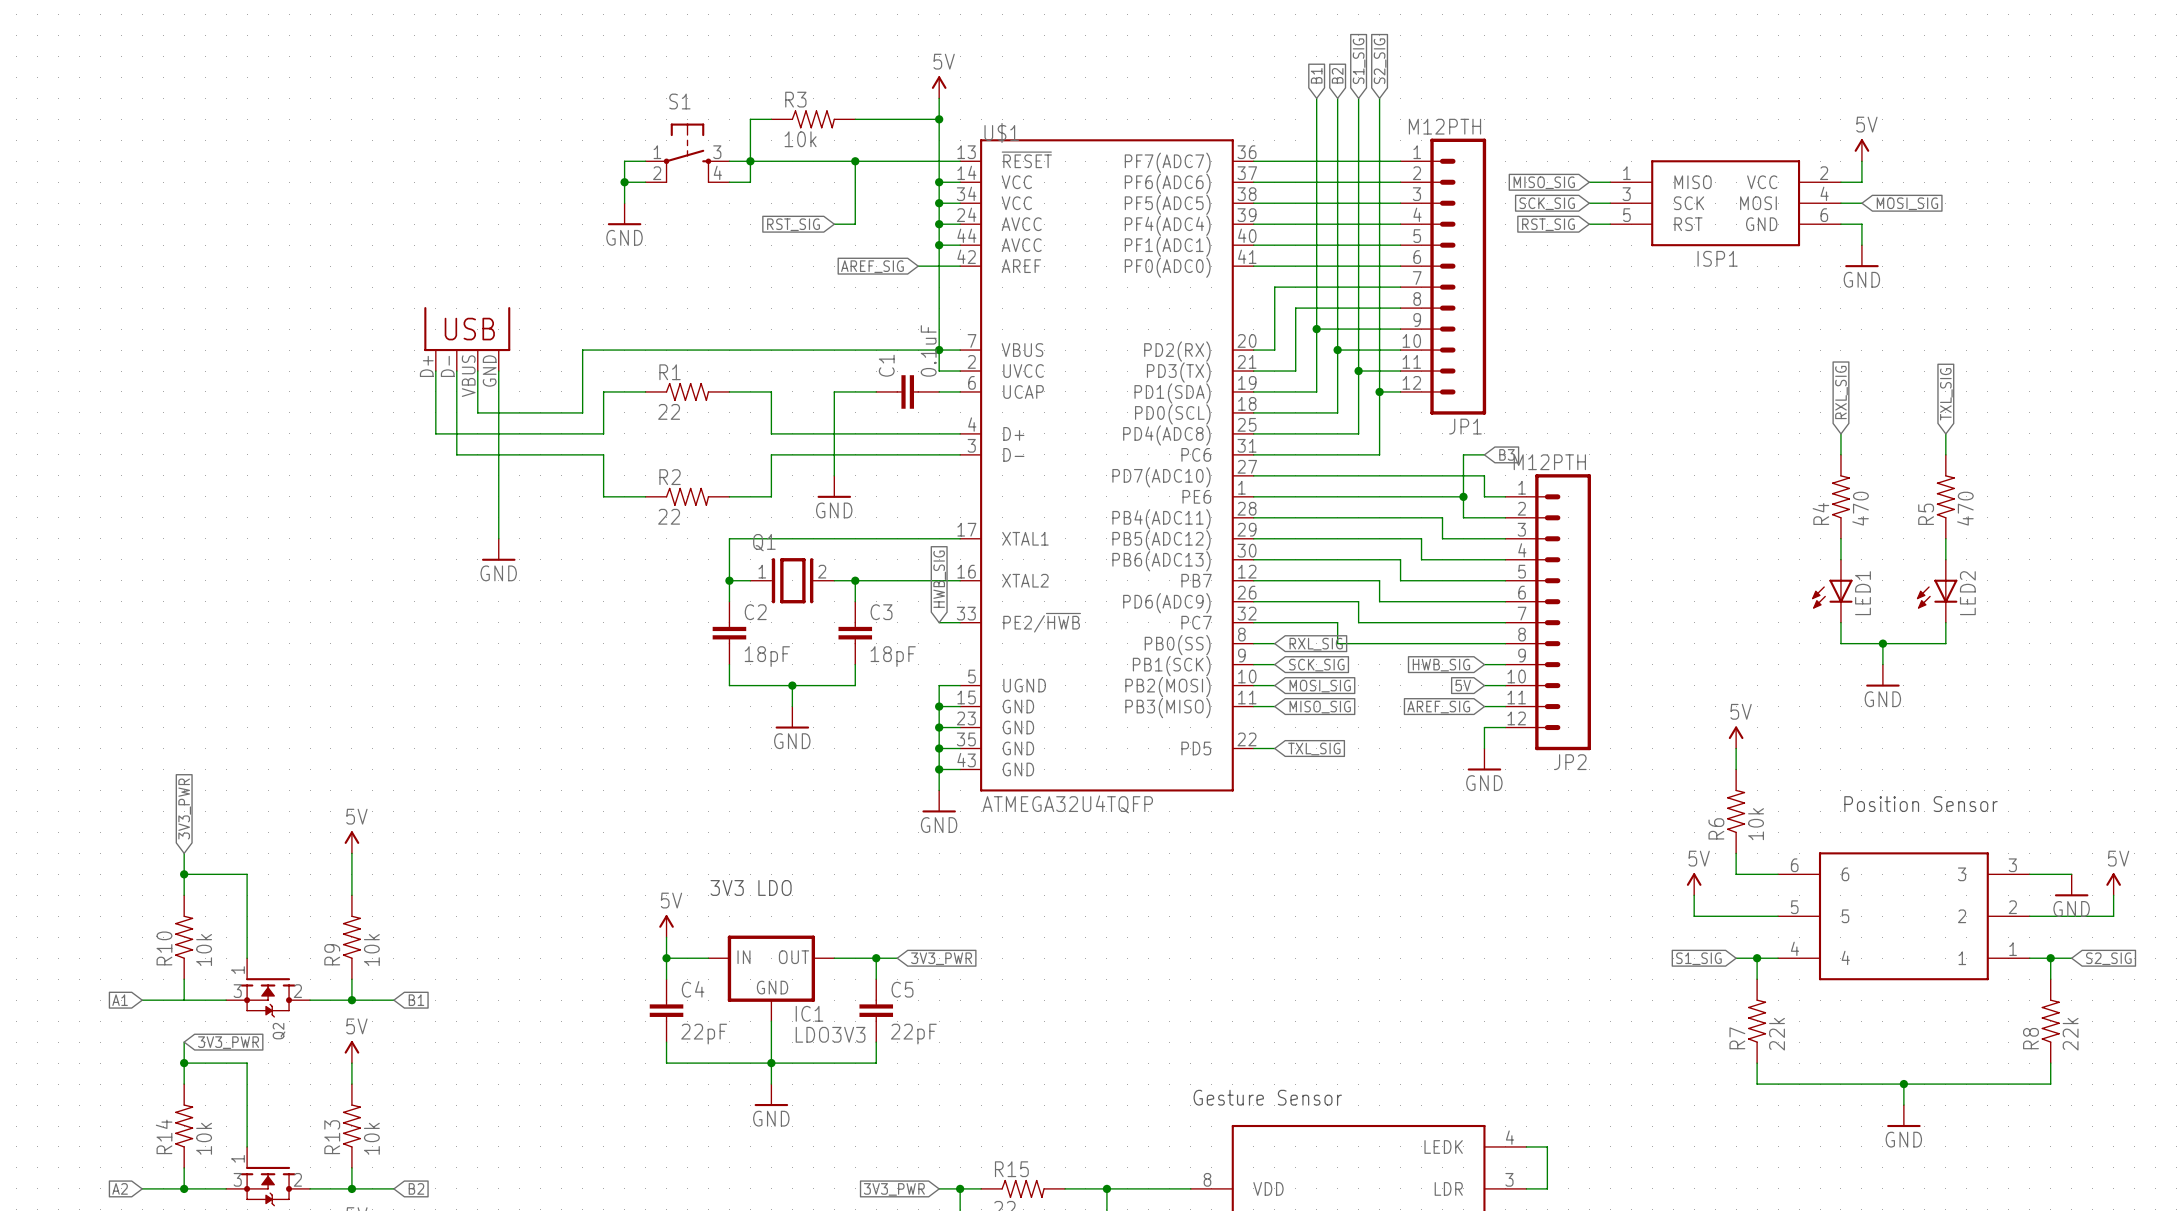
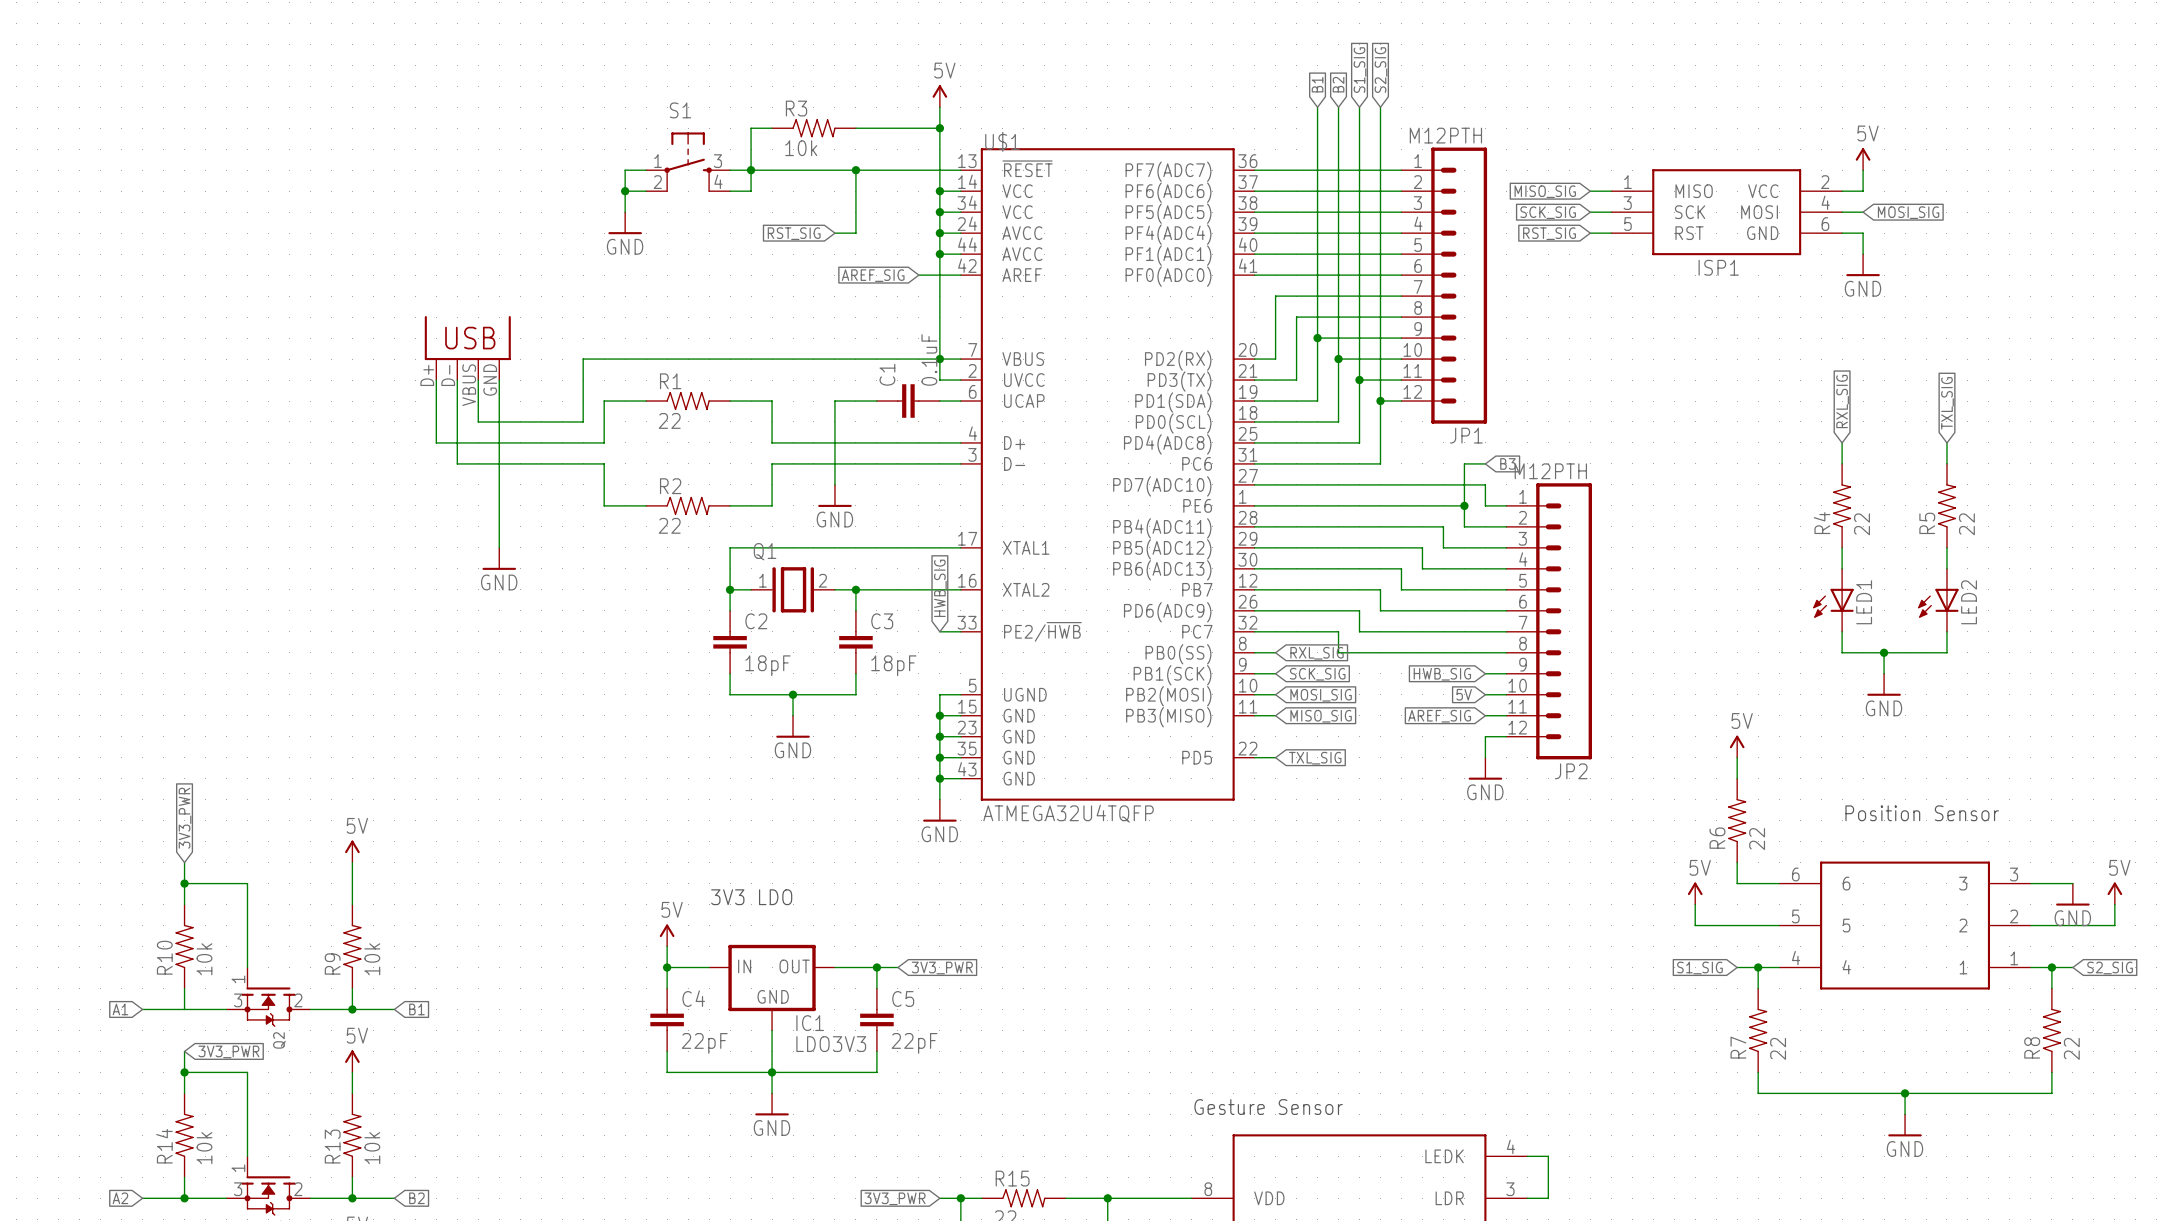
R4 value: 470 (1860, 508) -> 22 (1862, 524)
R5 value: 470 (1965, 508) -> 22 (1966, 524)
R6 value: 10k (1756, 824) -> 22 (1757, 839)
R7 value: 22k (1777, 1034) -> 22 (1778, 1048)
R8 value: 22k (2070, 1034) -> 22 (2071, 1048)

